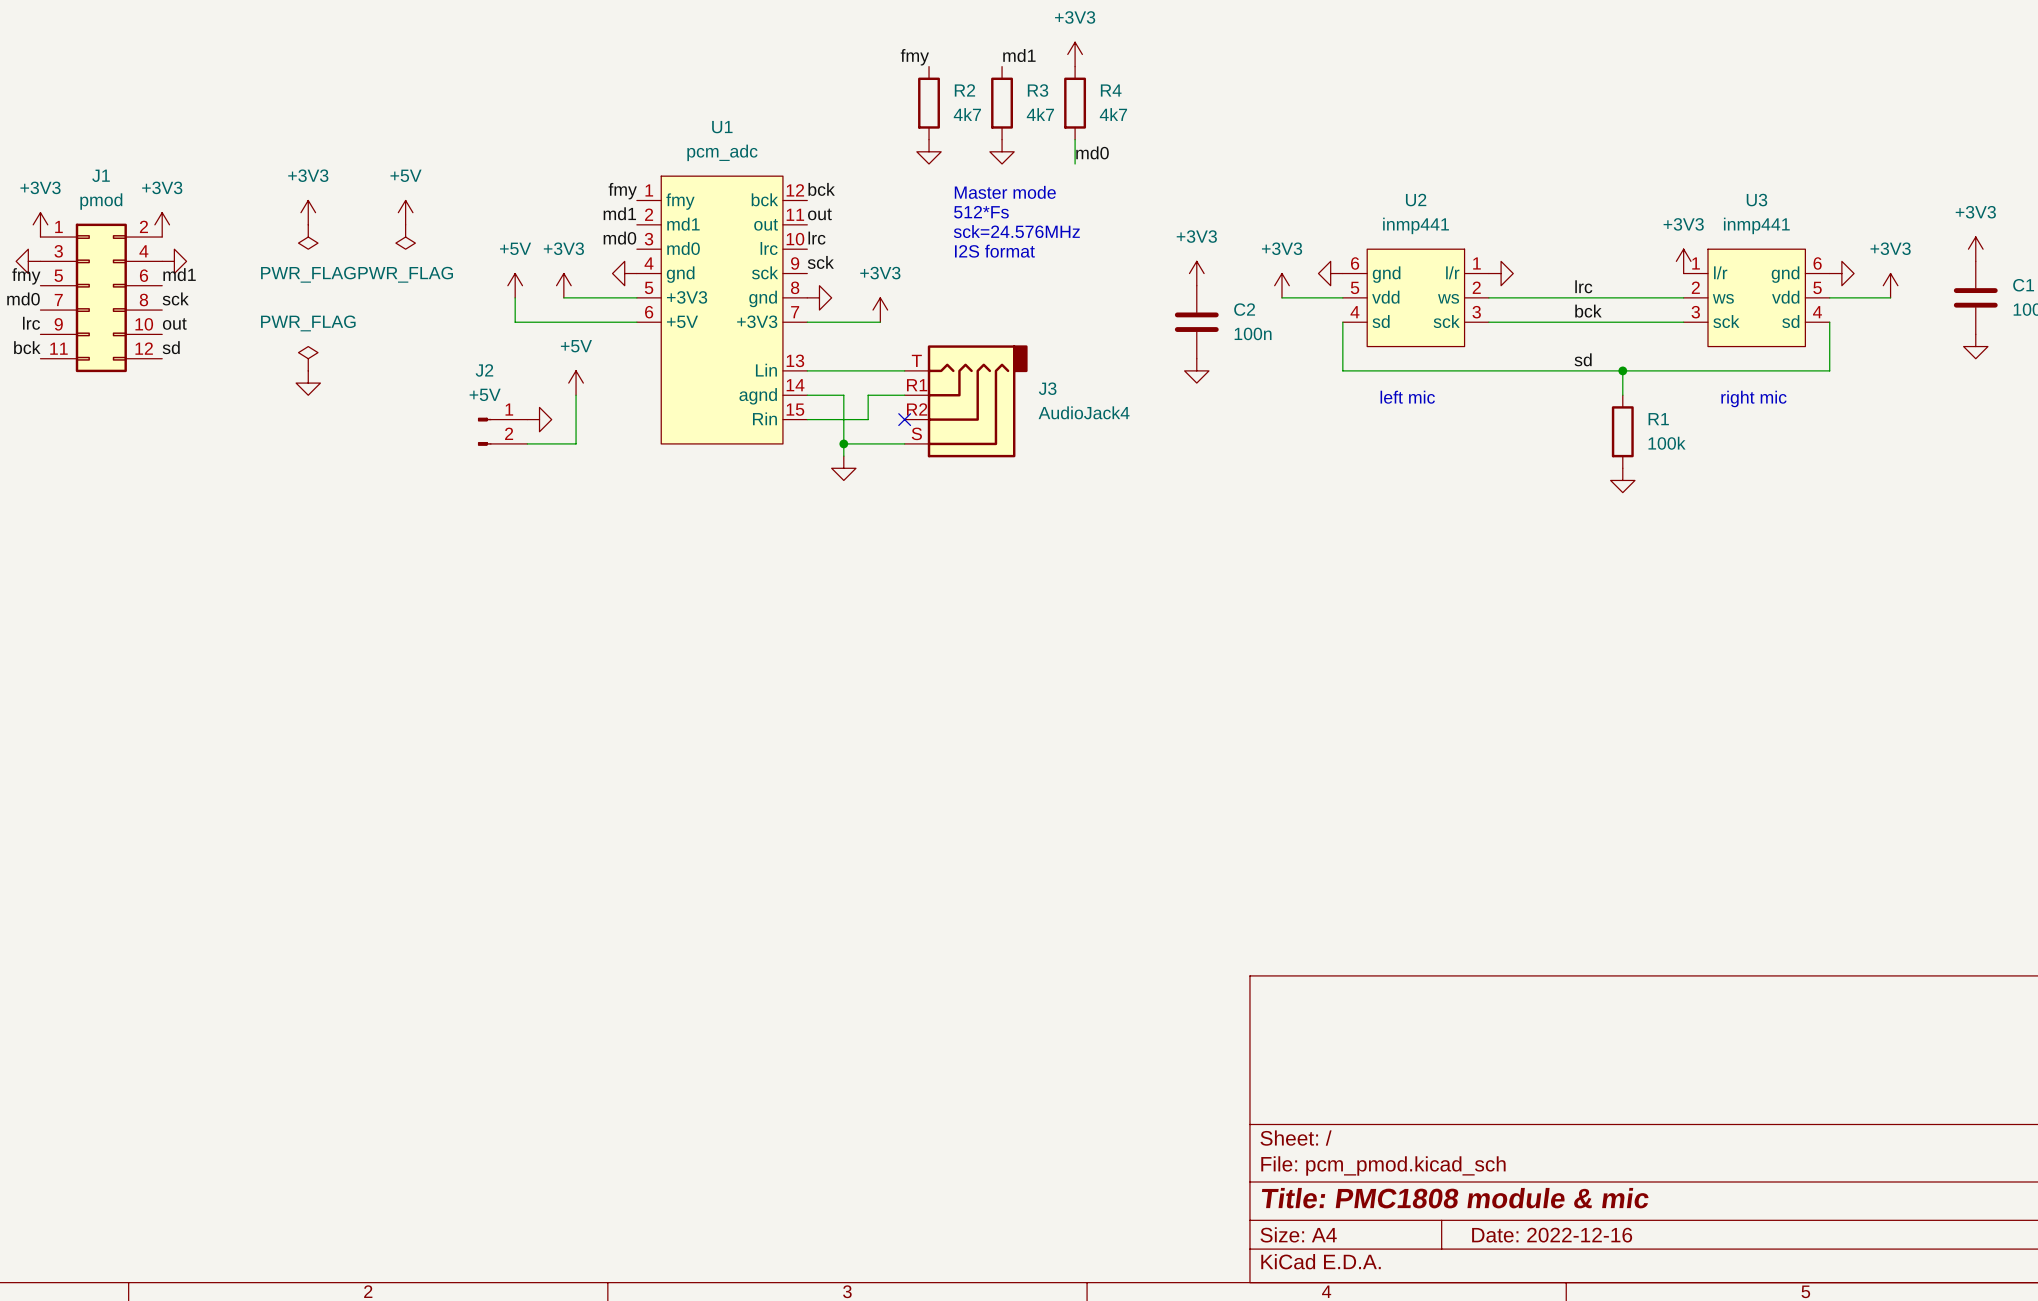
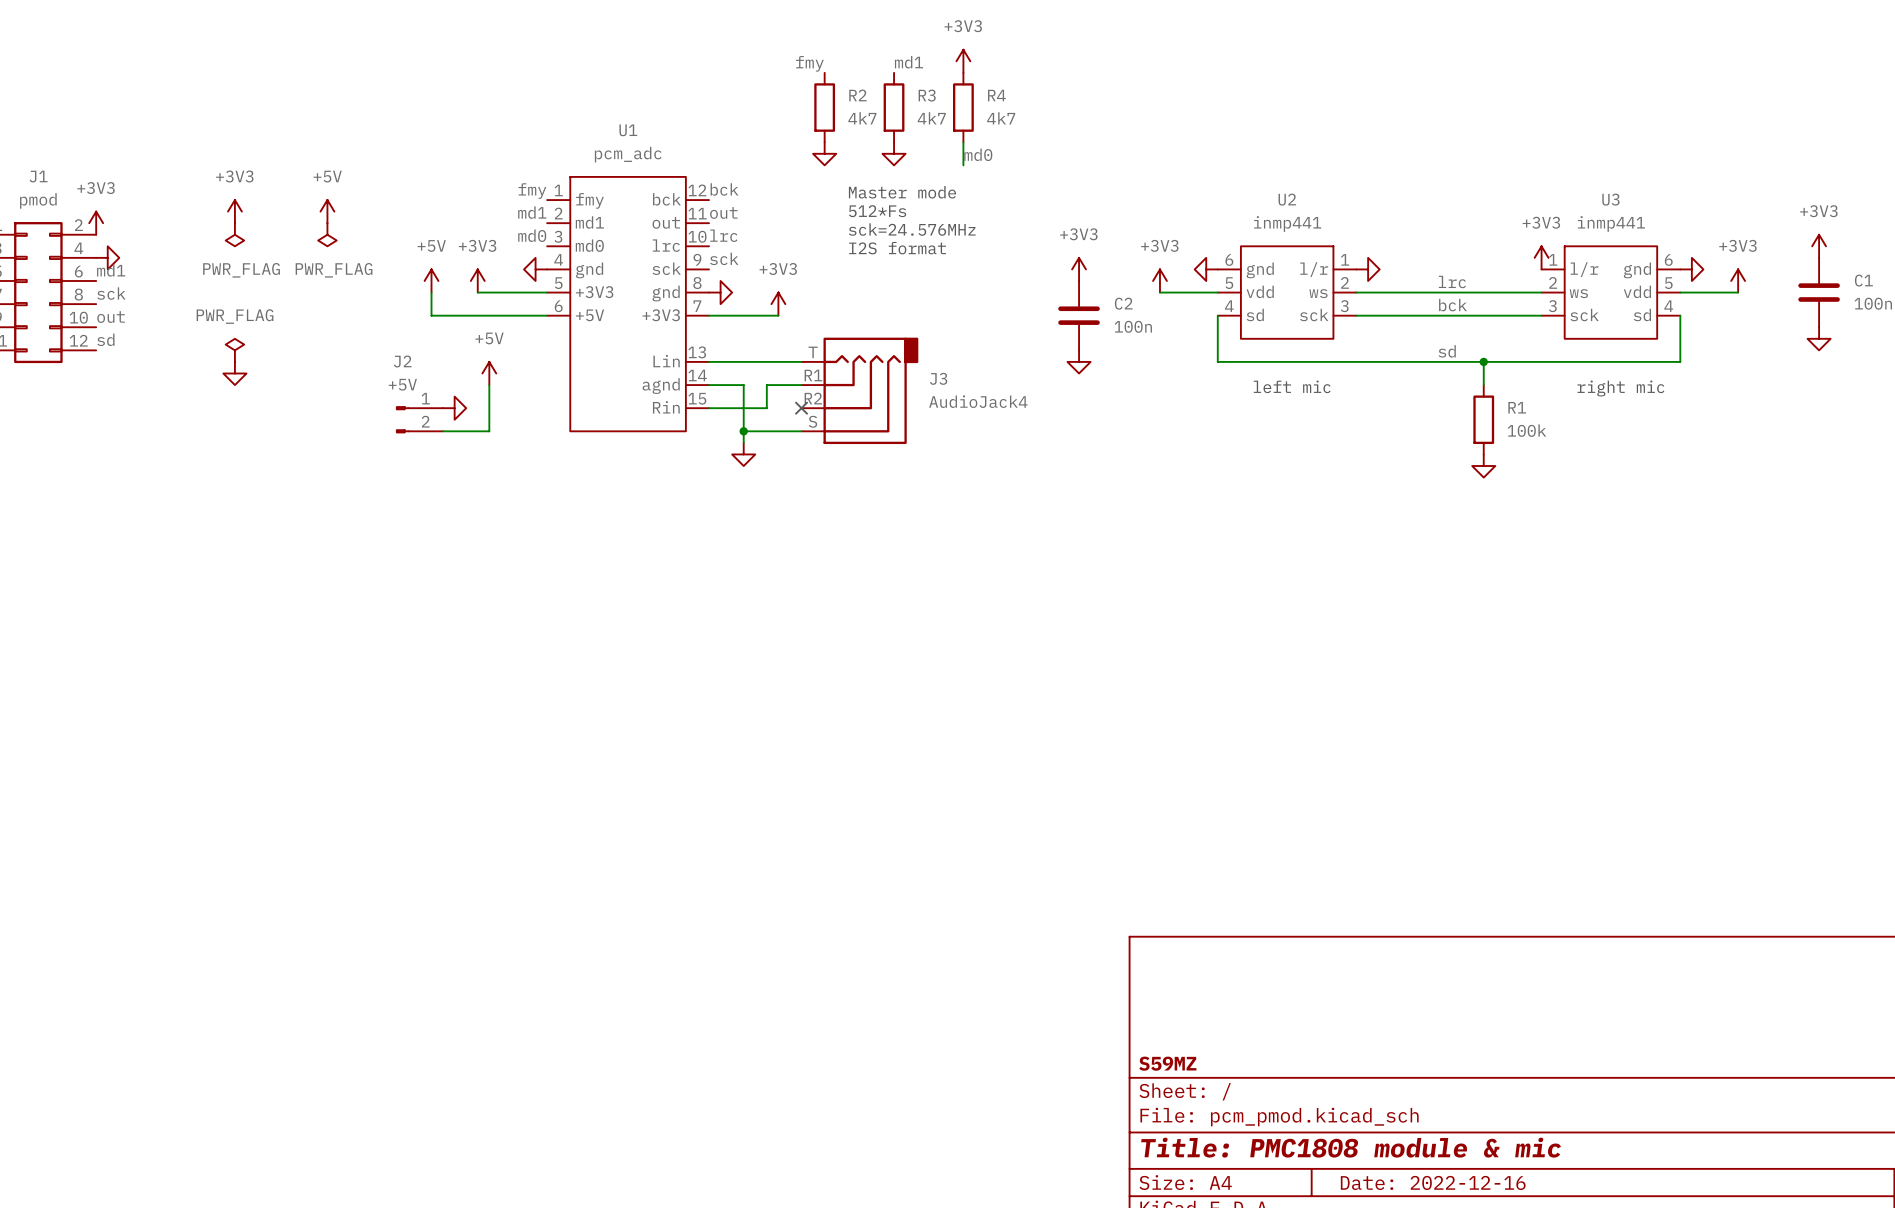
title block: none -> S59MZ (1167, 1063)

